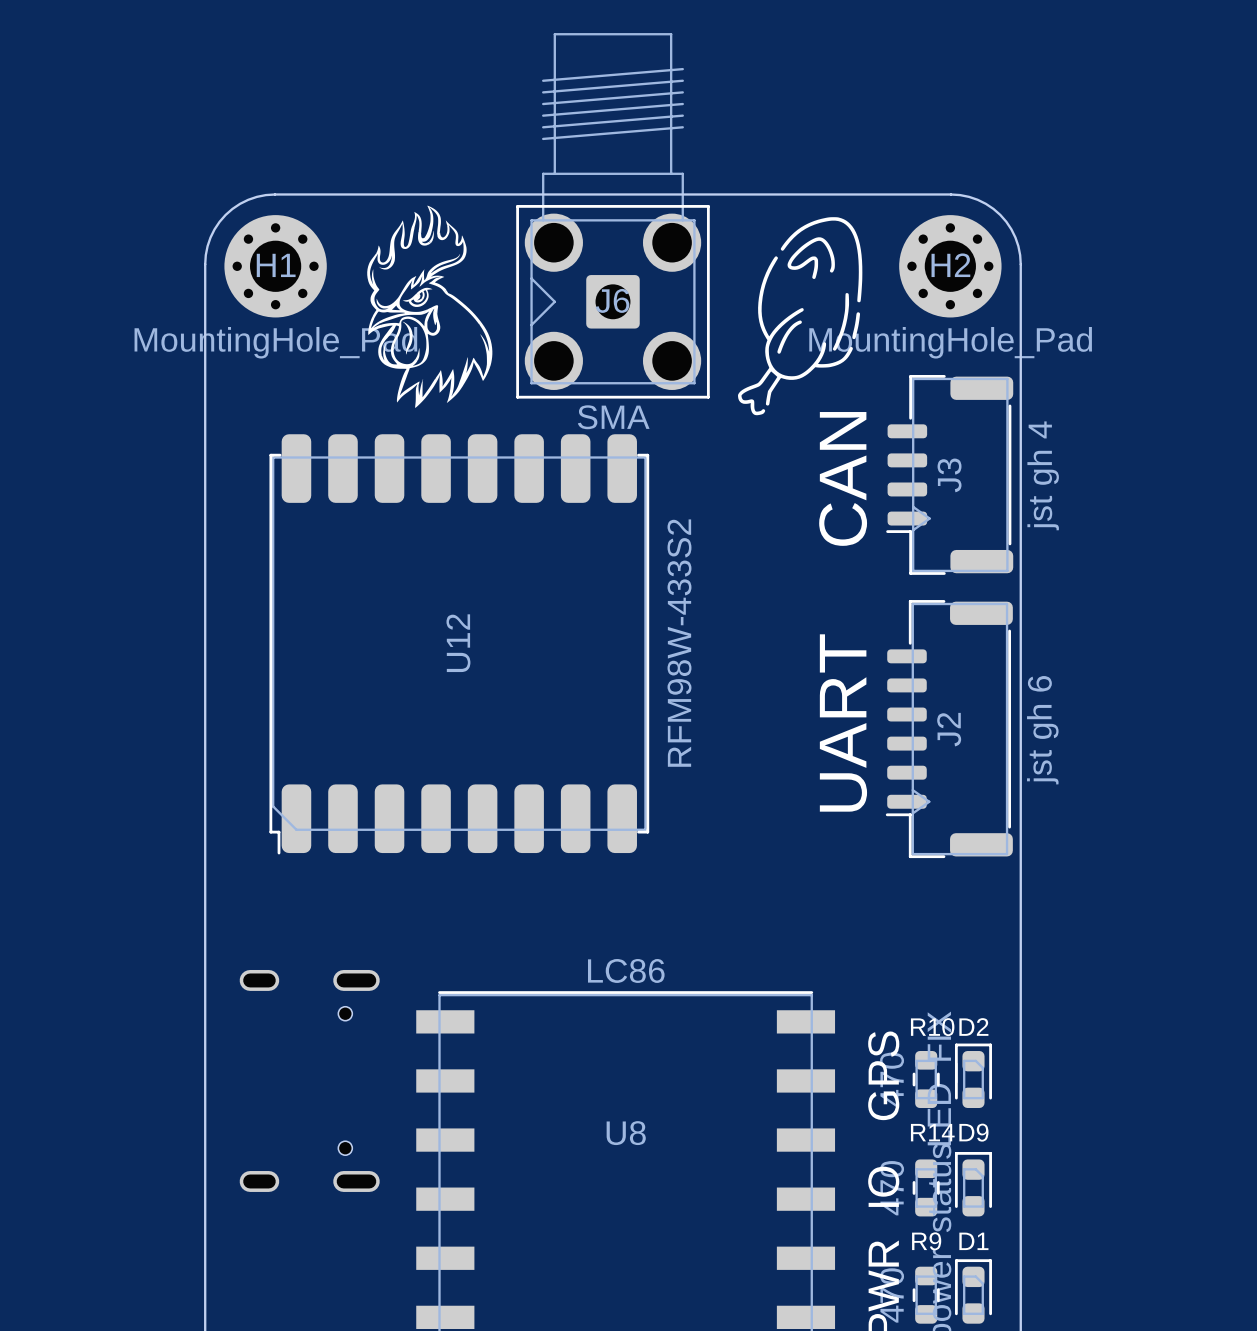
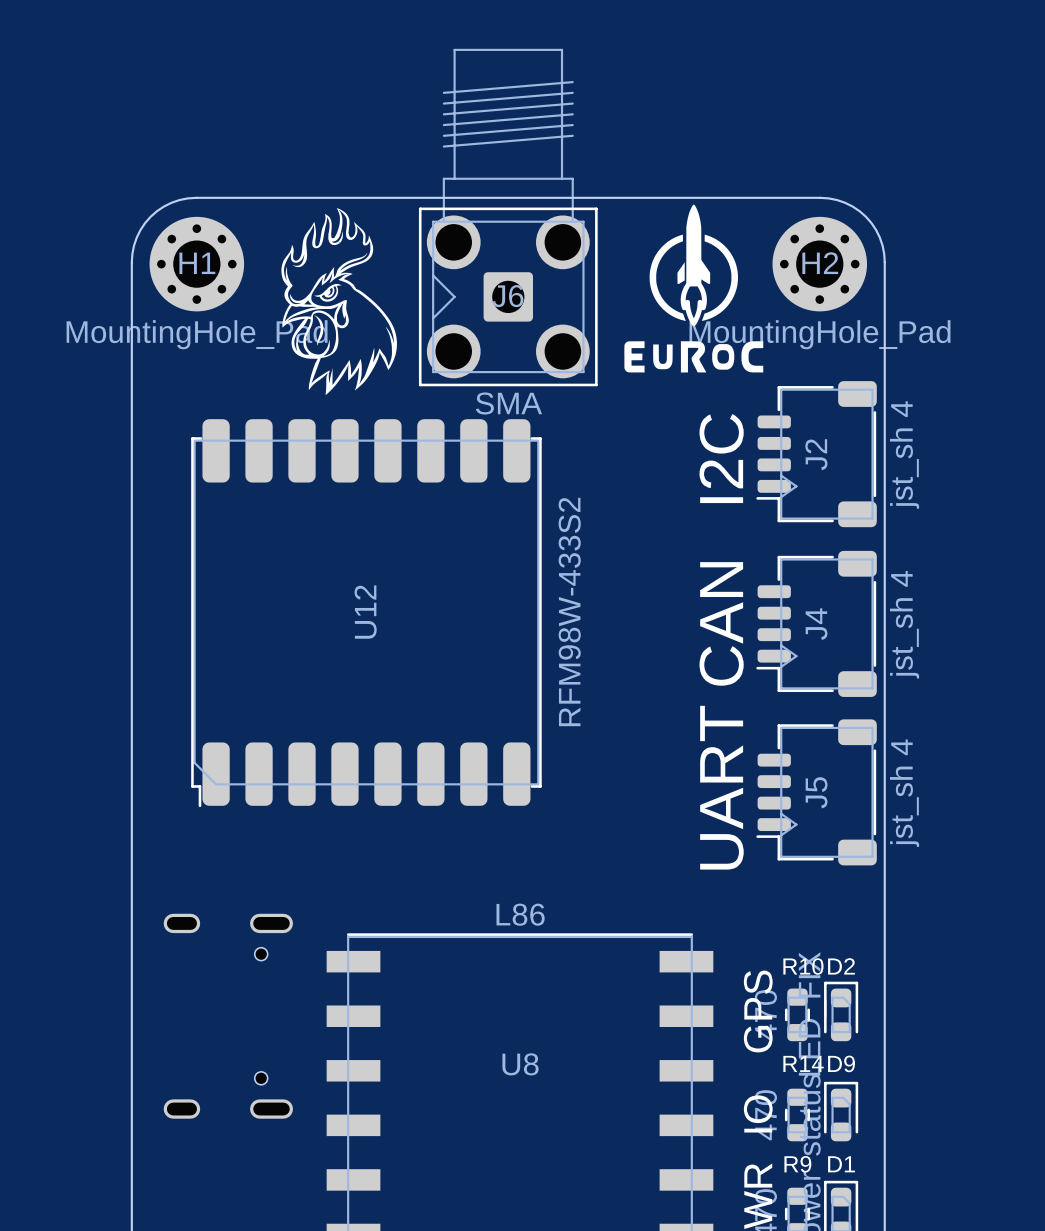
drawing: none -> [624, 204, 764, 373]
drawing: [738, 217, 863, 416] -> none
J3: jst gh 4 (949, 474) -> none
text: CAN (843, 478) -> I2C (721, 458)
J2 footprint: [885, 600, 1013, 859] -> [756, 381, 877, 528]
text: none -> CAN (721, 623)
J4: none -> jst_sh 4 (816, 623)
text position: UART (843, 722) -> UART (721, 787)
J2 value: jst gh 6 (1042, 730) -> jst_sh 4 (904, 454)
J5: none -> jst_sh 4 (816, 792)
U8 value: LC86 (626, 970) -> L86 (520, 914)

